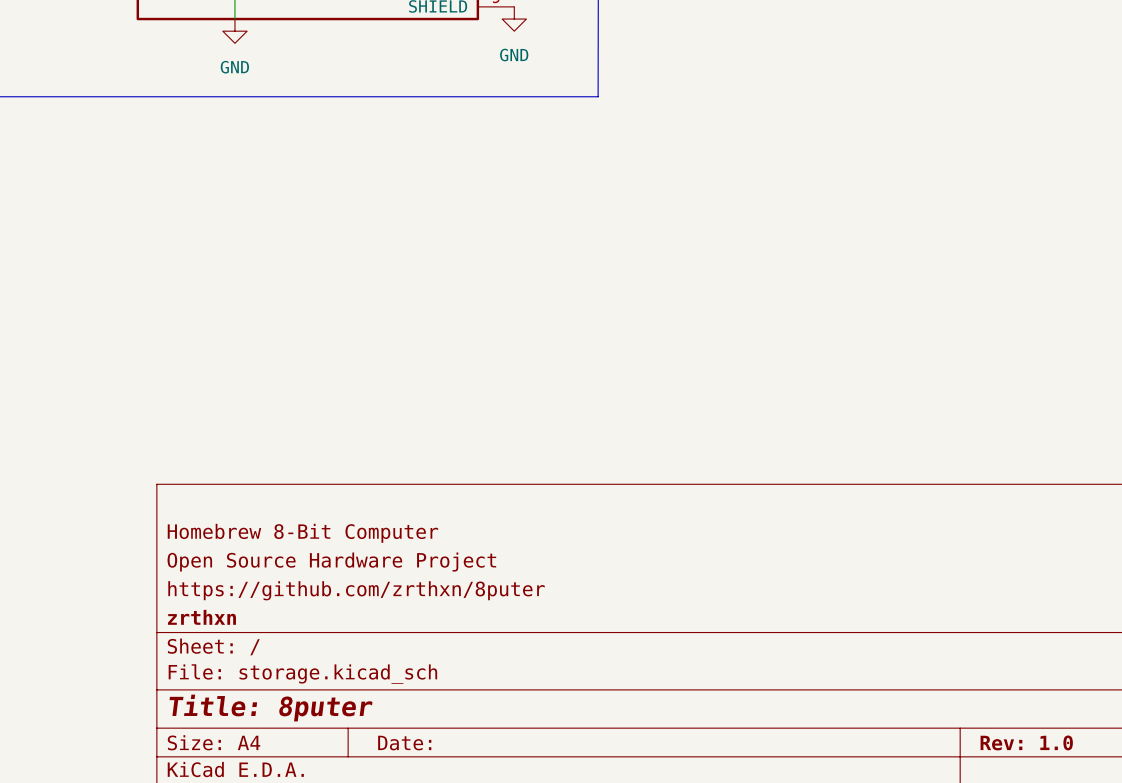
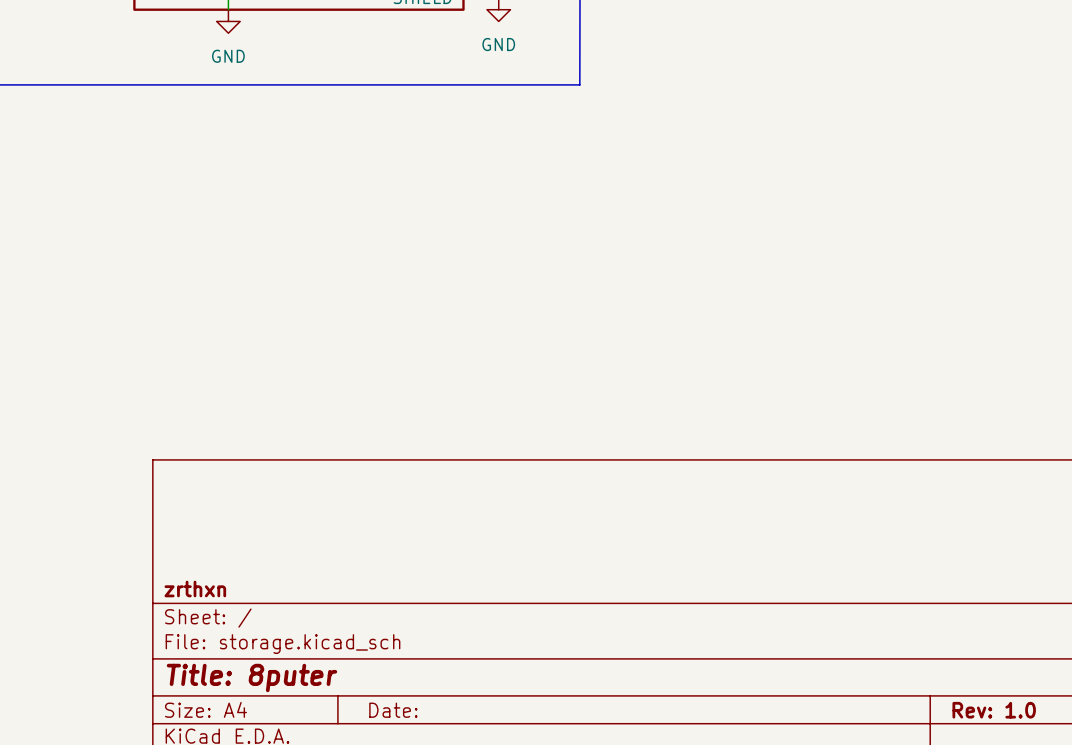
title block: Homebrew 8-Bit Computer (302, 533) -> none
title block: Open Source Hardware Project (331, 562) -> none
title block: https://github.com/zrthxn/8puter (356, 590) -> none

